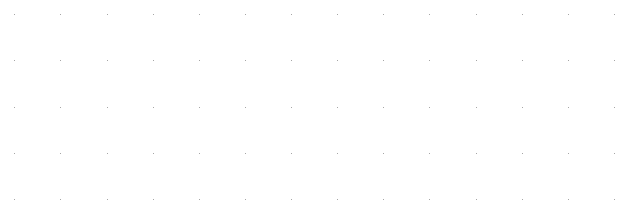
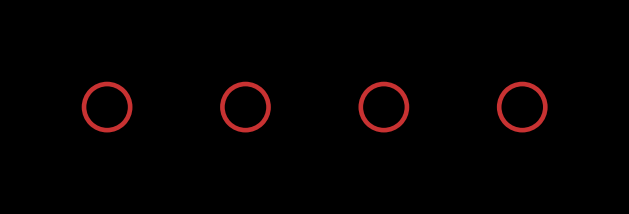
part: none -> (107, 107)
part: none -> (245, 107)
part: none -> (383, 107)
part: none -> (522, 107)

